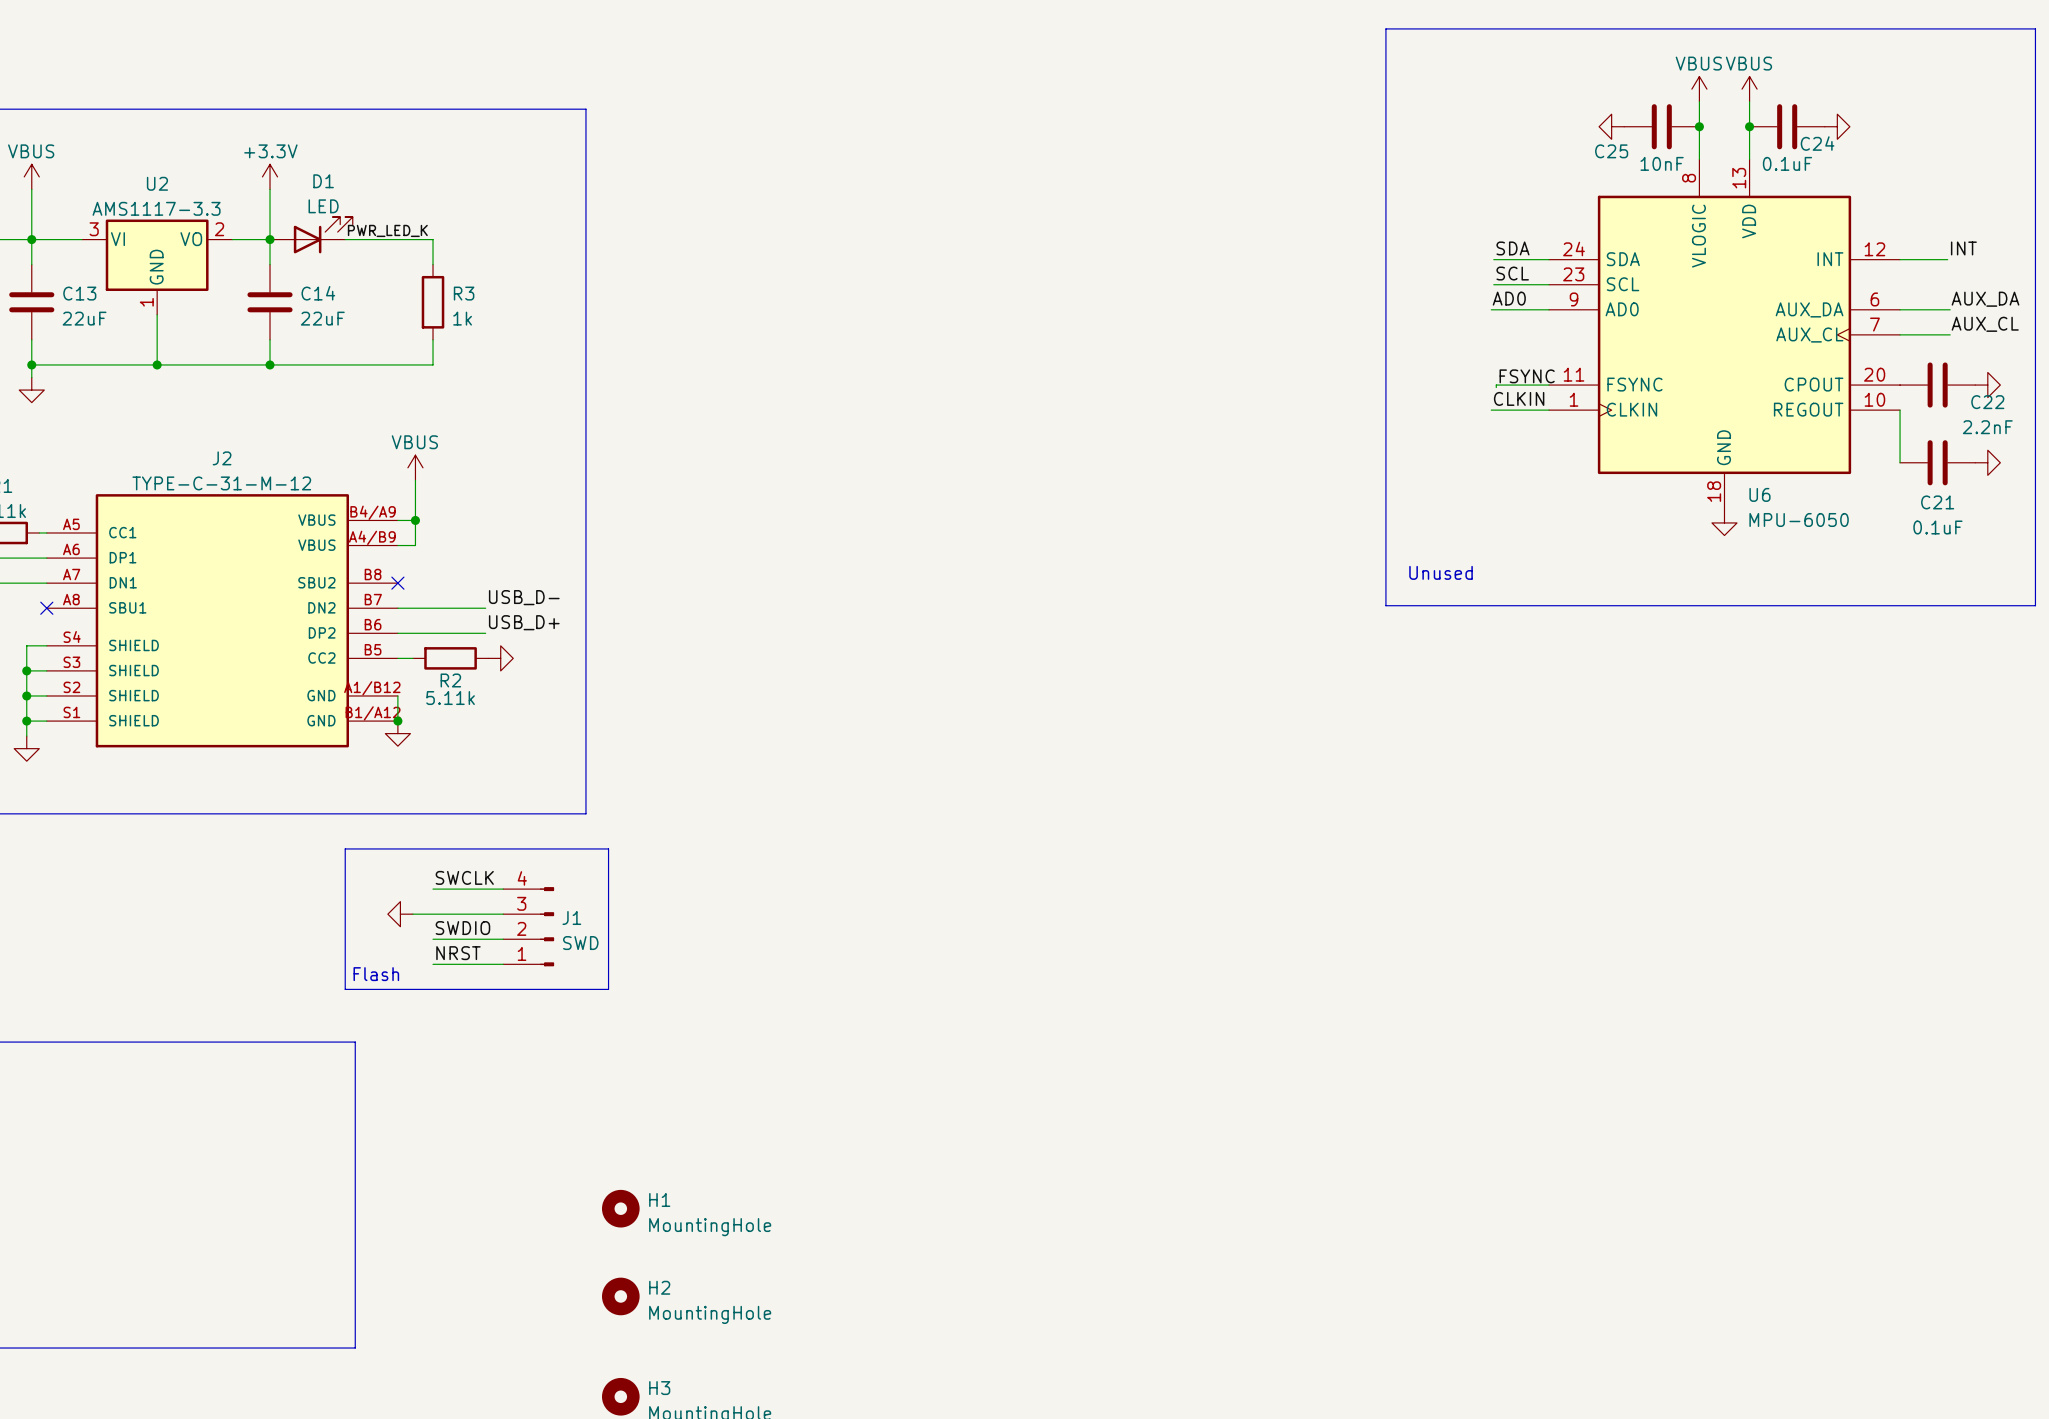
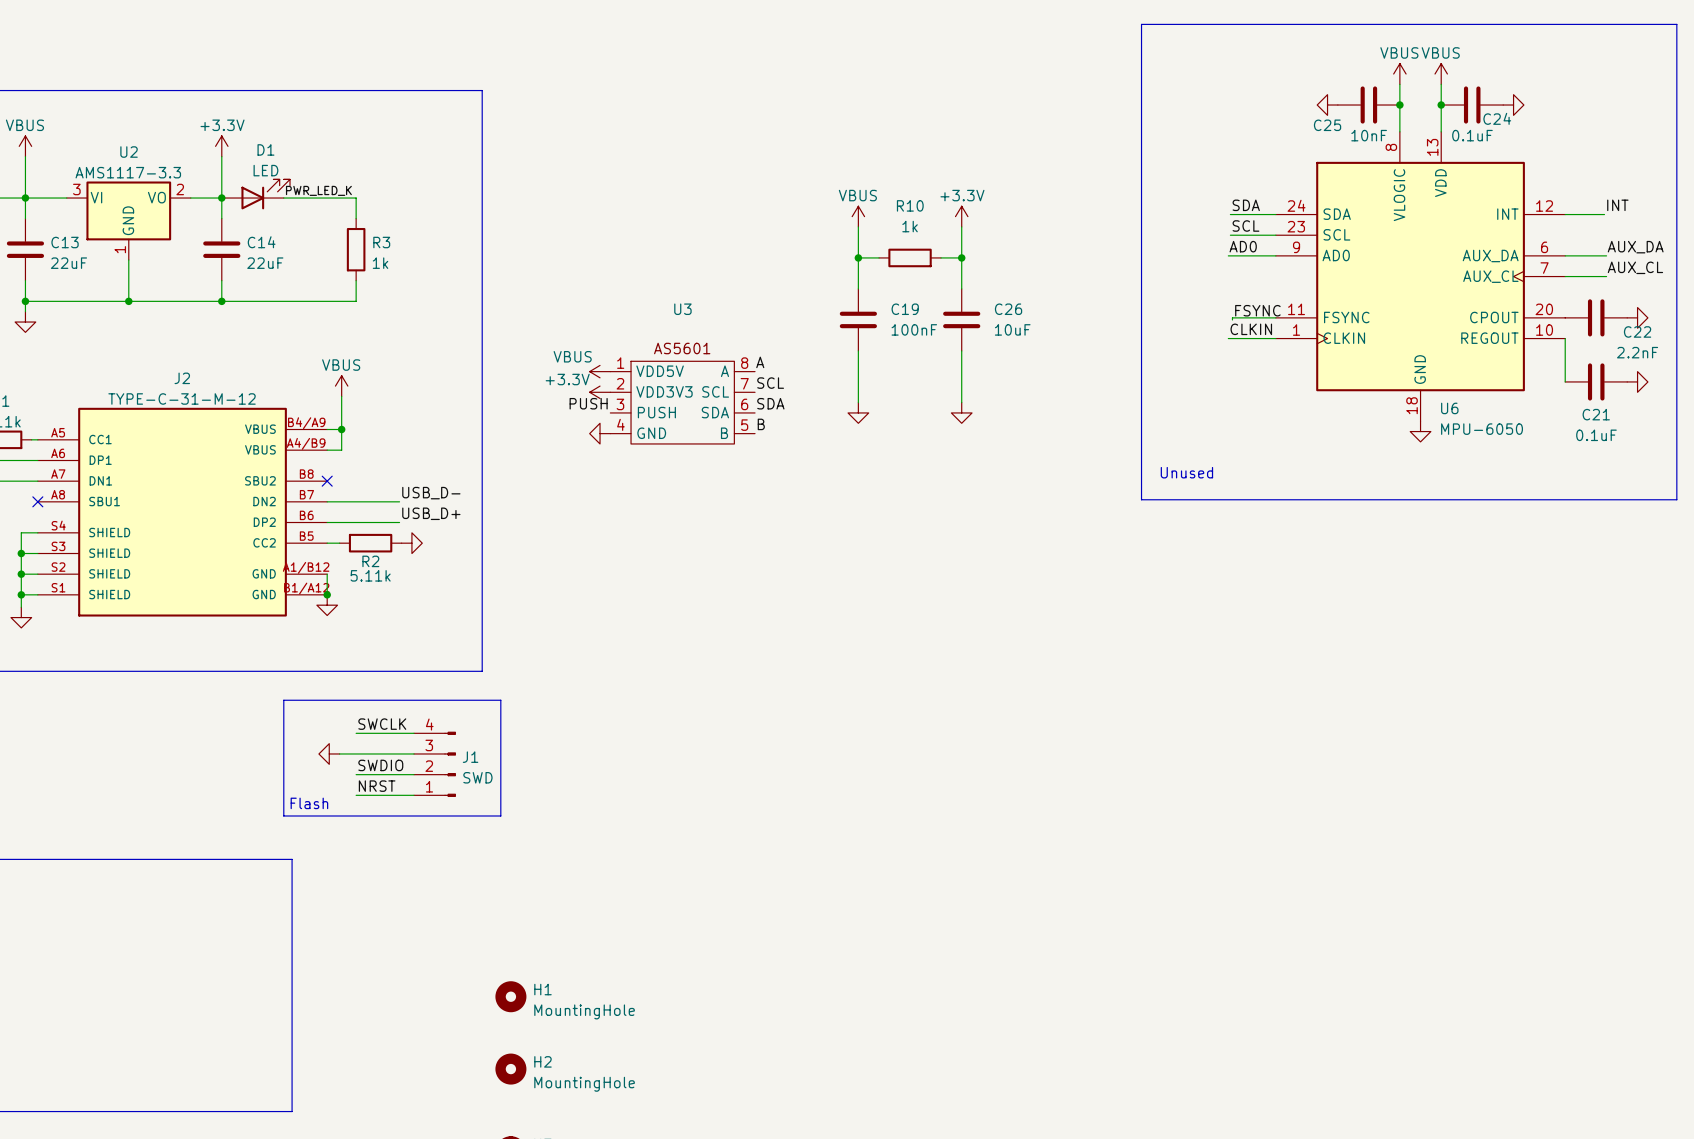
power symbol: none -> VBUS (858, 216)
power symbol: none -> +3.3V (961, 216)
wire: none -> (858, 226) (858, 288)
wire: none -> (961, 226) (961, 288)
wire: none -> (858, 257) (879, 257)
junction: none -> (858, 257)
R10: none -> 1k (910, 257)
wire: none -> (941, 257) (961, 257)
junction: none -> (961, 257)
C19: none -> 100nF (858, 319)
C26: none -> 10uF (961, 319)
wire: none -> (858, 350) (858, 402)
wire: none -> (961, 350) (961, 402)
label: none -> A (760, 362)
power symbol: none -> VBUS (600, 371)
label: none -> SCL (770, 383)
power symbol: none -> +3.3V (600, 392)
U3: none -> (682, 402)
label: none -> PUSH (588, 403)
label: none -> SDA (770, 403)
power symbol: none -> (858, 412)
power symbol: none -> (961, 412)
label: none -> B (761, 424)
power symbol: none -> (600, 433)

